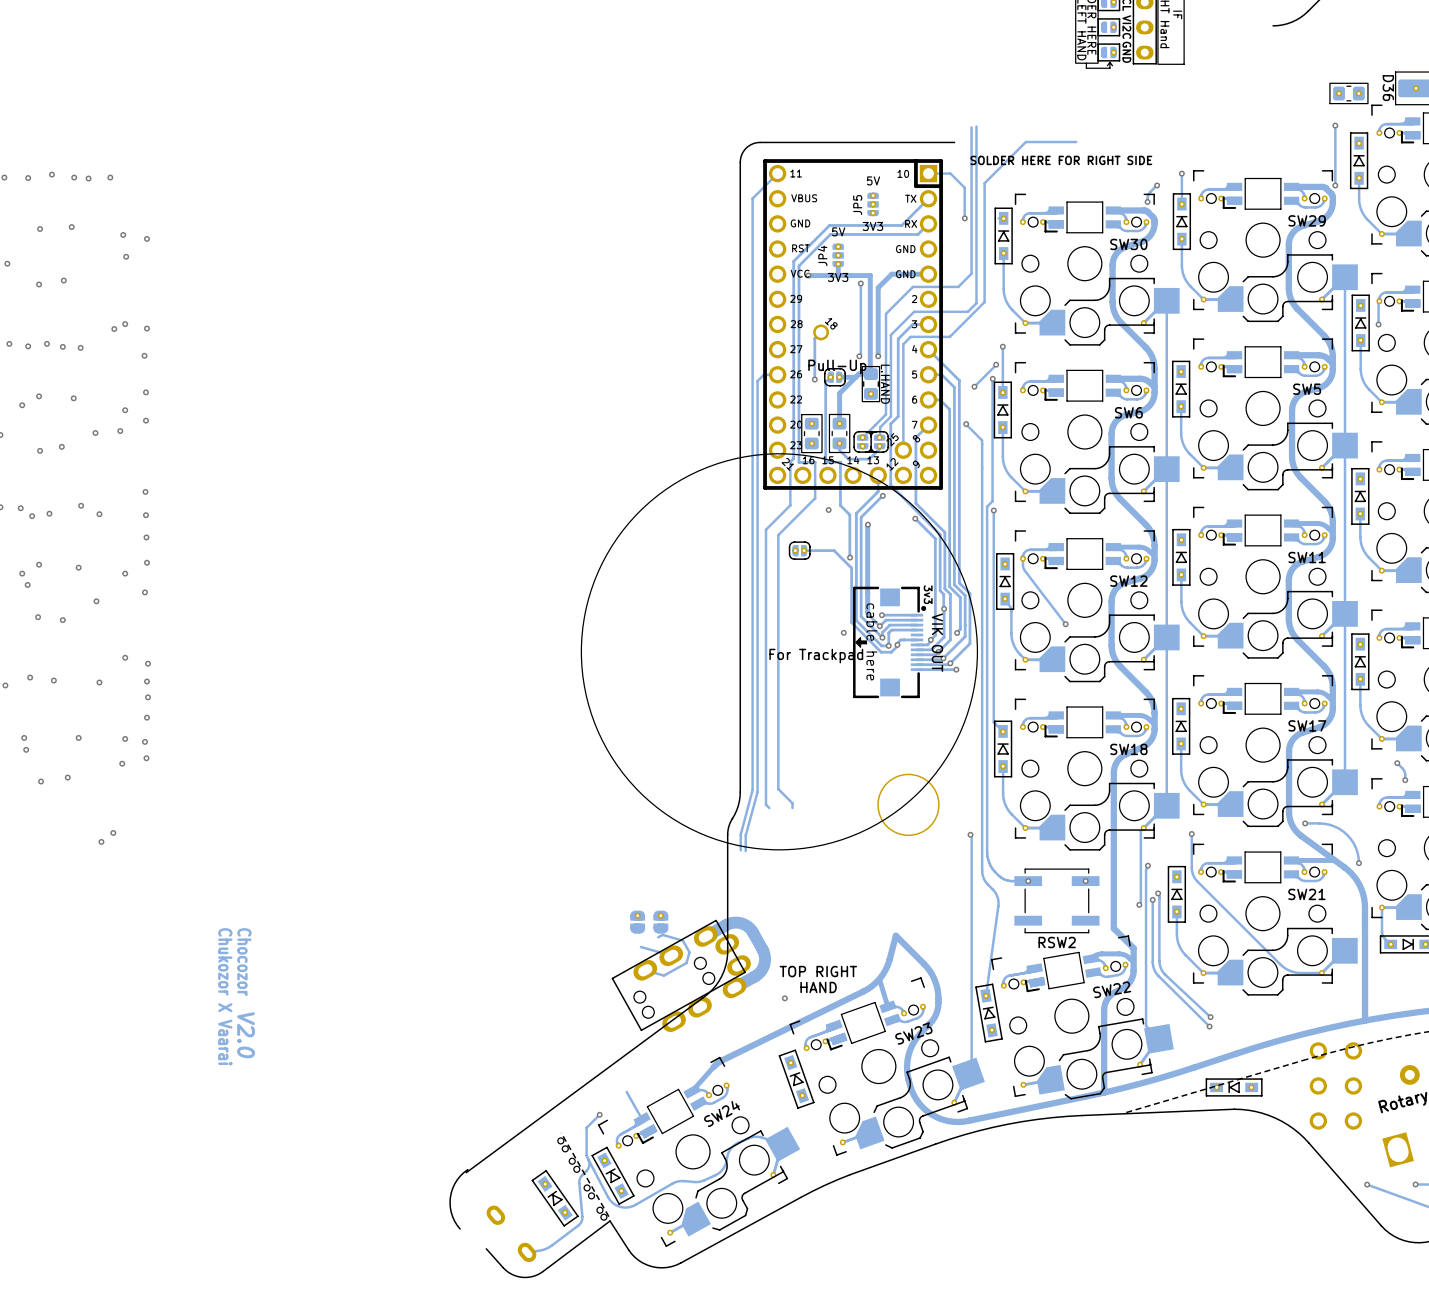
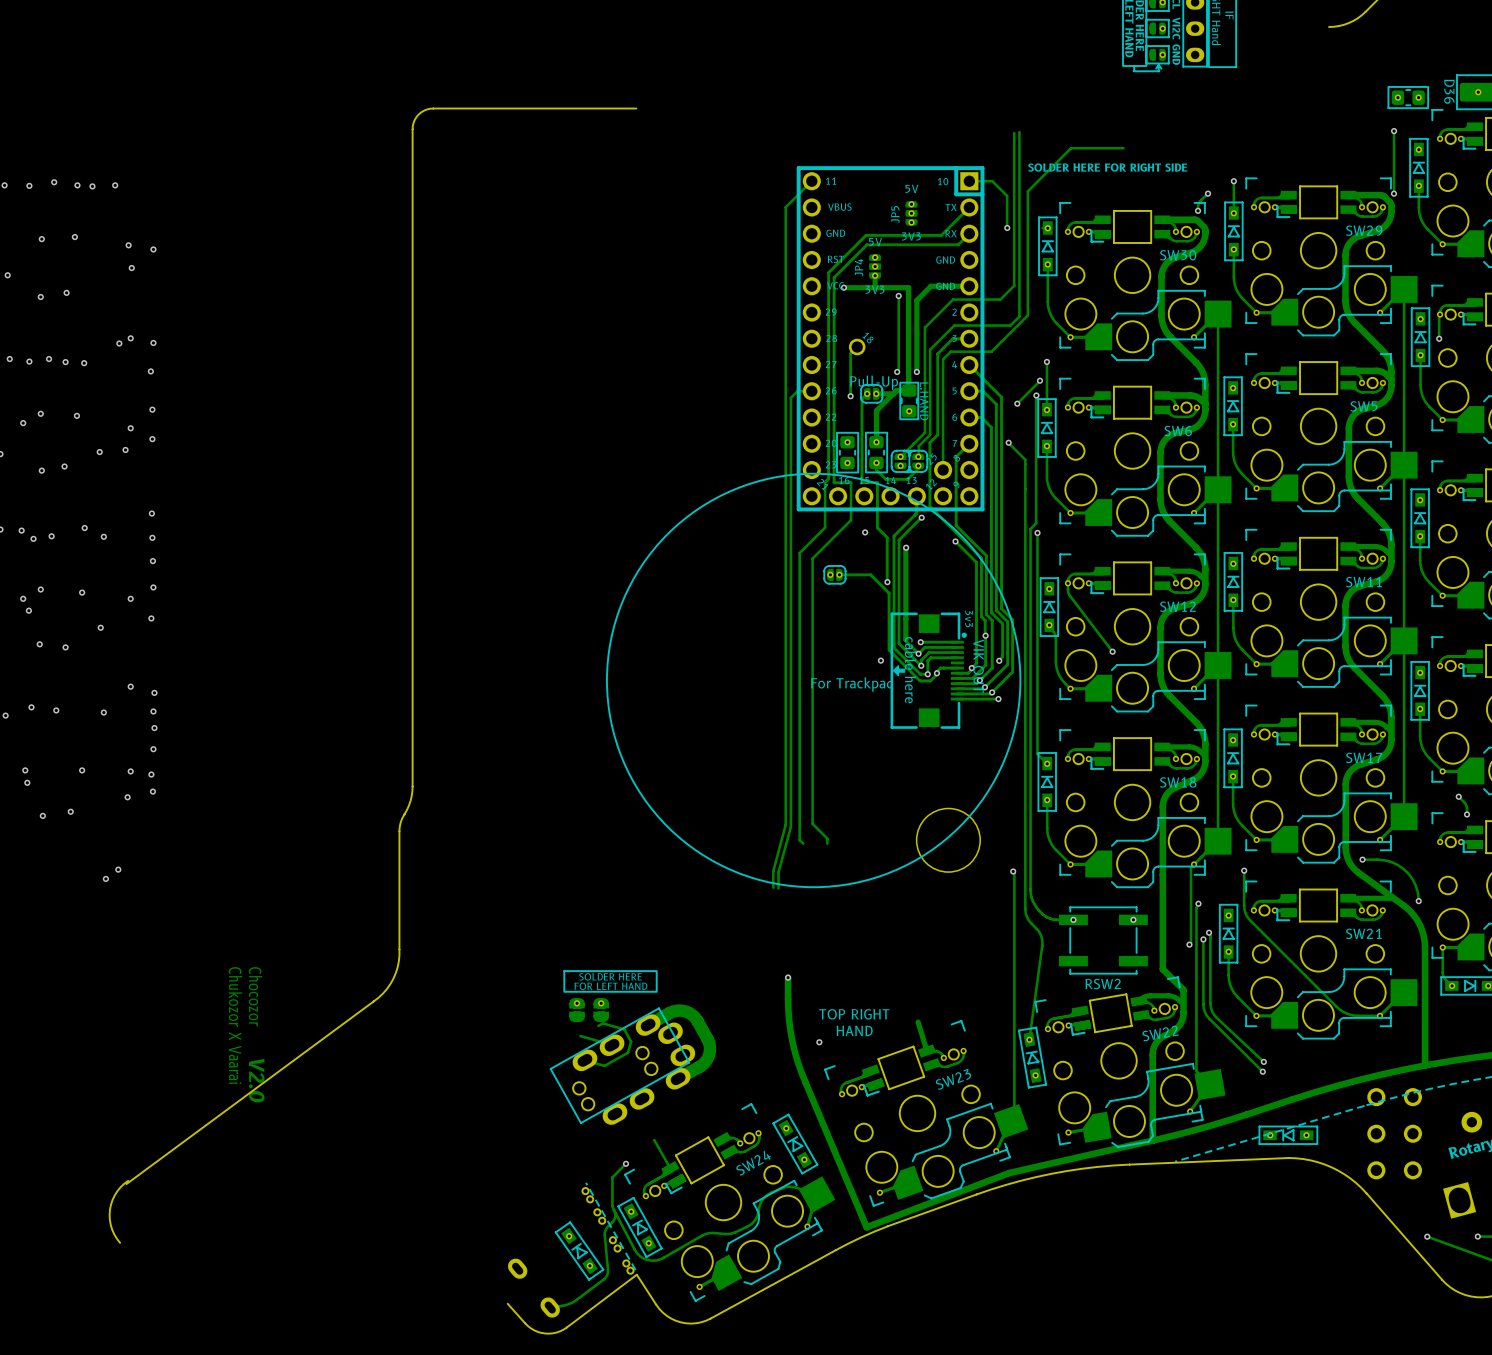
board edge: none -> (636, 108) (433, 108) (422, 111) (414, 121) (412, 129) (412, 786) (410, 800) (399, 828) (399, 955) (397, 967) (390, 984) (378, 997) (126, 1184)
board edge: (954, 142) (760, 142) (748, 146) (741, 154) (740, 791) (738, 805) (727, 831) (727, 953) (725, 965) (719, 981) (707, 994) (466, 1172) -> none
part: (649, 922) -> none
track: (705, 936) (734, 922) (745, 924) (753, 932) (764, 953) (764, 964) (756, 975) (734, 987) -> (648, 1025) (671, 1012) (678, 1010) (689, 1013) (697, 1021) (709, 1043) (709, 1054) (701, 1065) (678, 1078)
via: none -> (788, 977)
track: (658, 937) (662, 934) (682, 940) (689, 952) (686, 963) (664, 975) (645, 970) -> (598, 1025) (603, 1023) (624, 1029) (631, 1041) (627, 1052) (604, 1065) (584, 1060)
track: (640, 947) (671, 955) -> (580, 1036) (611, 1044)
part: none -> (610, 996)
part position: (681, 975) -> (622, 1066)
part: (796, 1079) -> none
track: (691, 1091) (720, 1061) (872, 985) (885, 969) (895, 935) (927, 967) (937, 989) (938, 1002) (936, 1014) (914, 1041) (907, 1060) (907, 1075) (911, 1090) (923, 1108) (942, 1119) (964, 1121) (1084, 1096) -> (788, 977) (789, 1020) (797, 1062) (866, 1227) (1009, 1173) (1132, 1145)
part: none -> (795, 1144)
board edge: none -> (128, 1180) (114, 1195) (109, 1210) (110, 1225) (120, 1242)
board edge: (467, 1169) (457, 1179) (450, 1197) (451, 1212) (460, 1229) -> none

